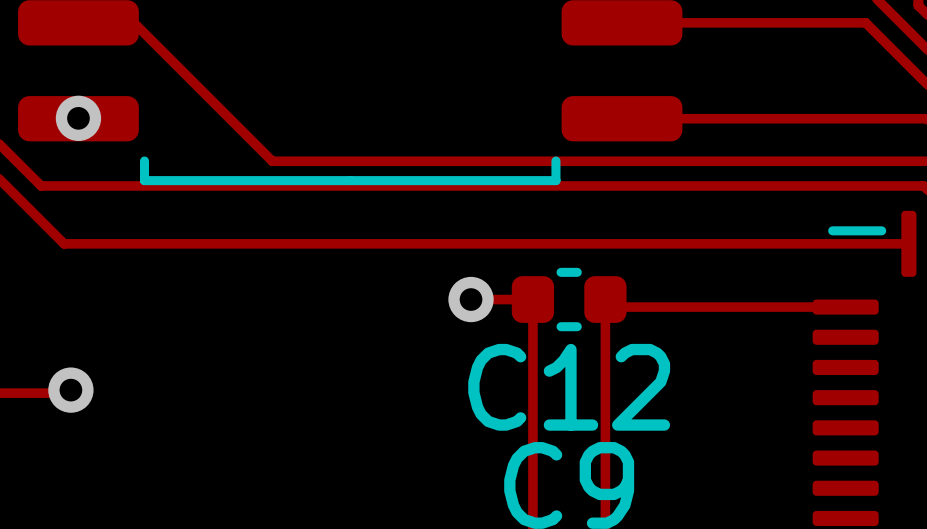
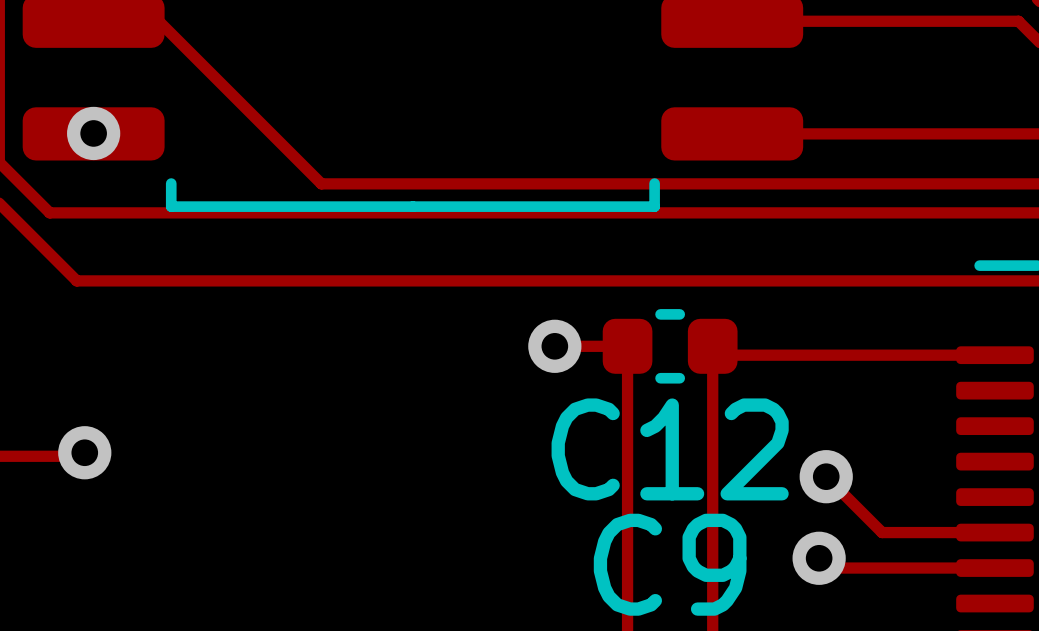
track: none -> (826, 476) (882, 532) (994, 532)
via: none -> (826, 476)
track: none -> (819, 558) (828, 568) (994, 568)
via: none -> (819, 558)

